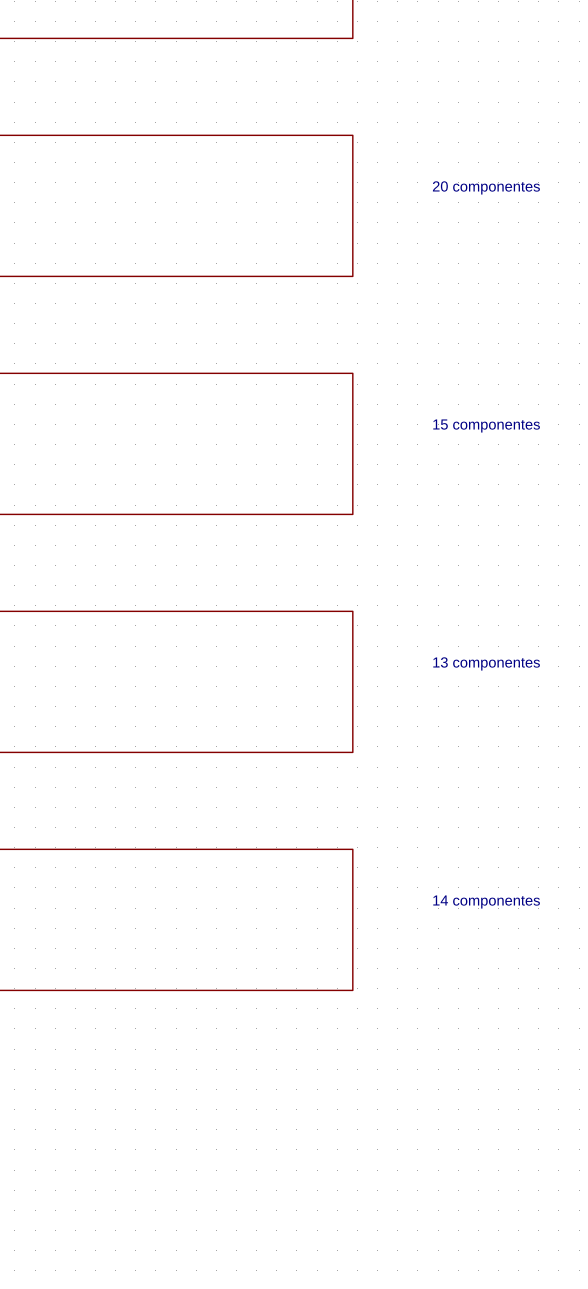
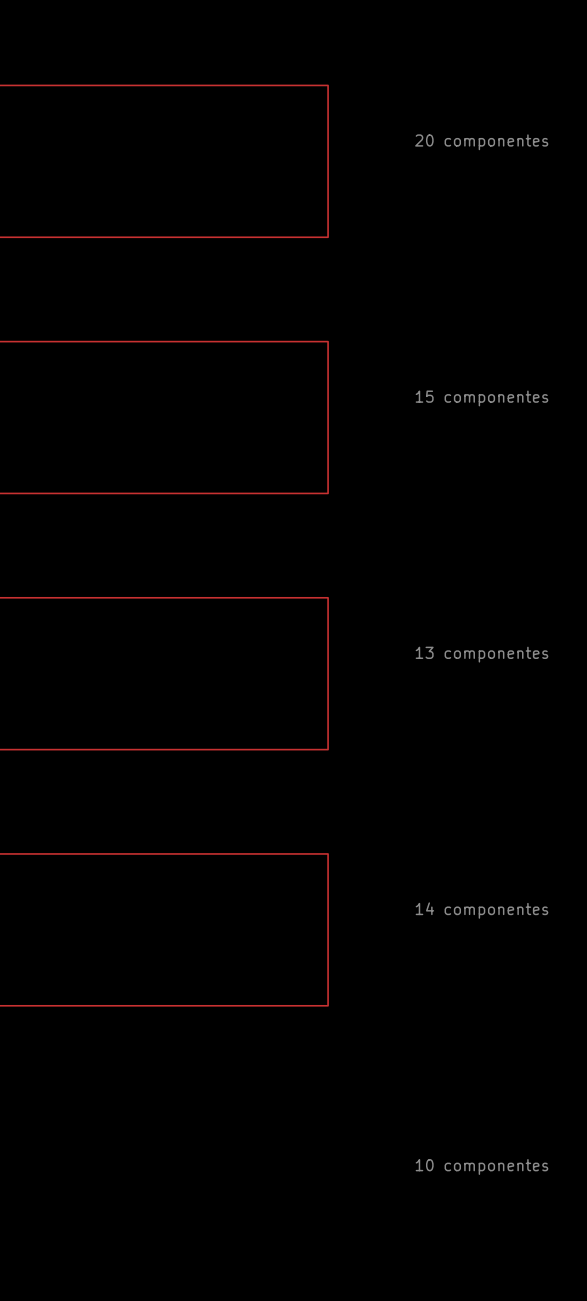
text: none -> 10 componentes (481, 1166)

